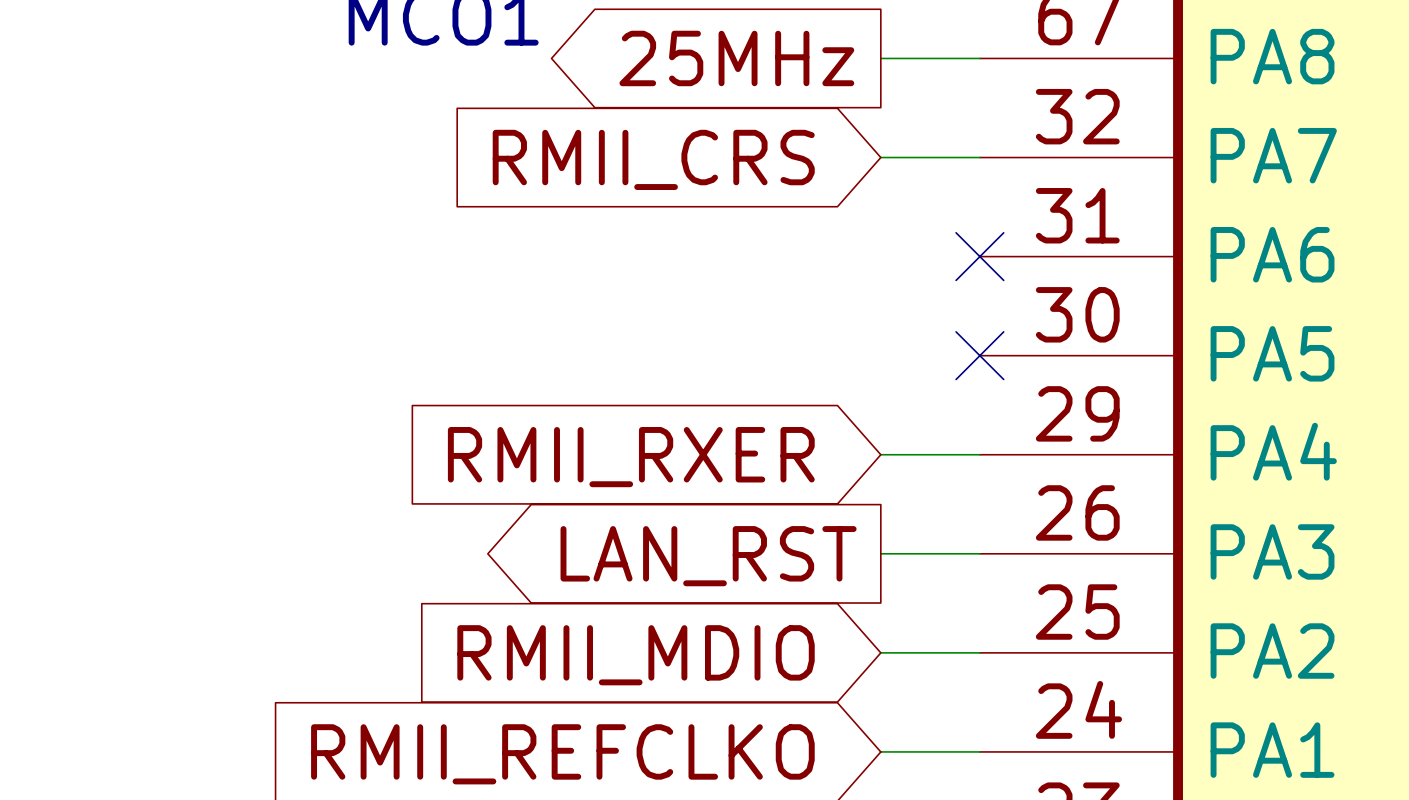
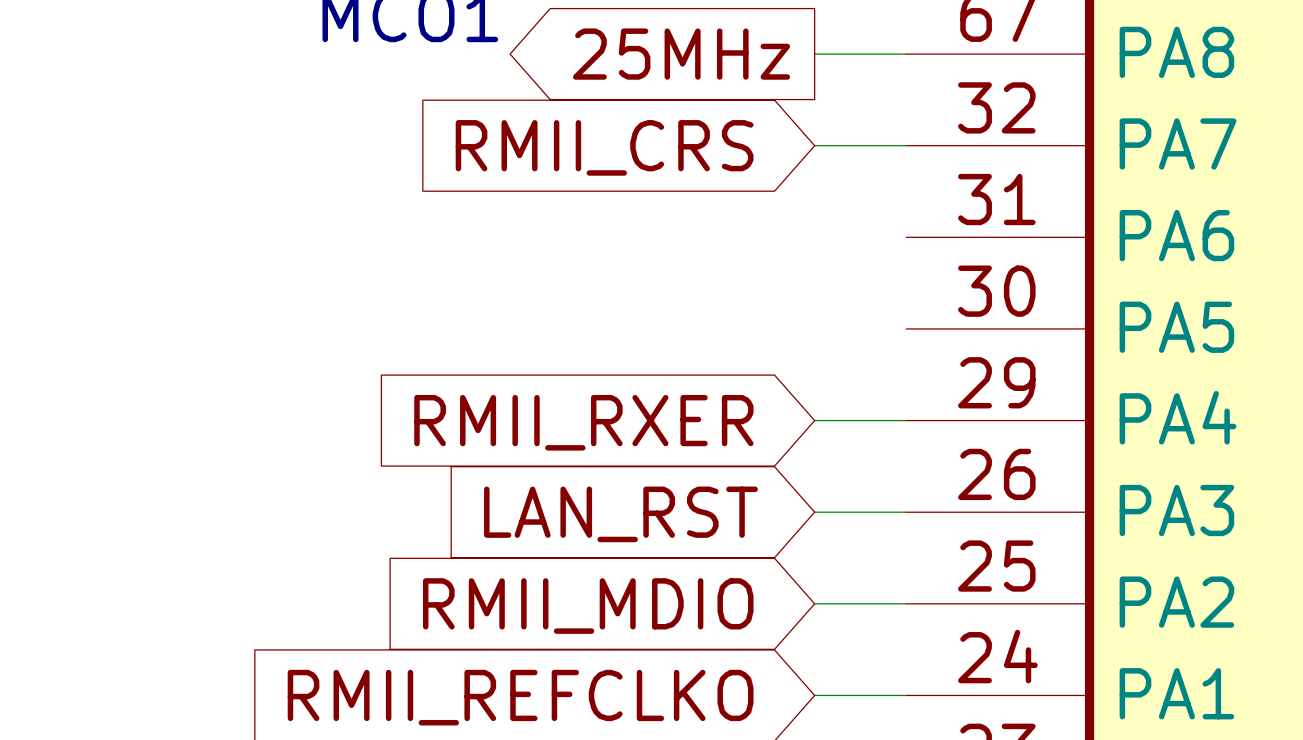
no-connect mark: (979, 256) -> none
no-connect mark: (979, 355) -> none
global label shape: output (708, 556) -> input (620, 514)

